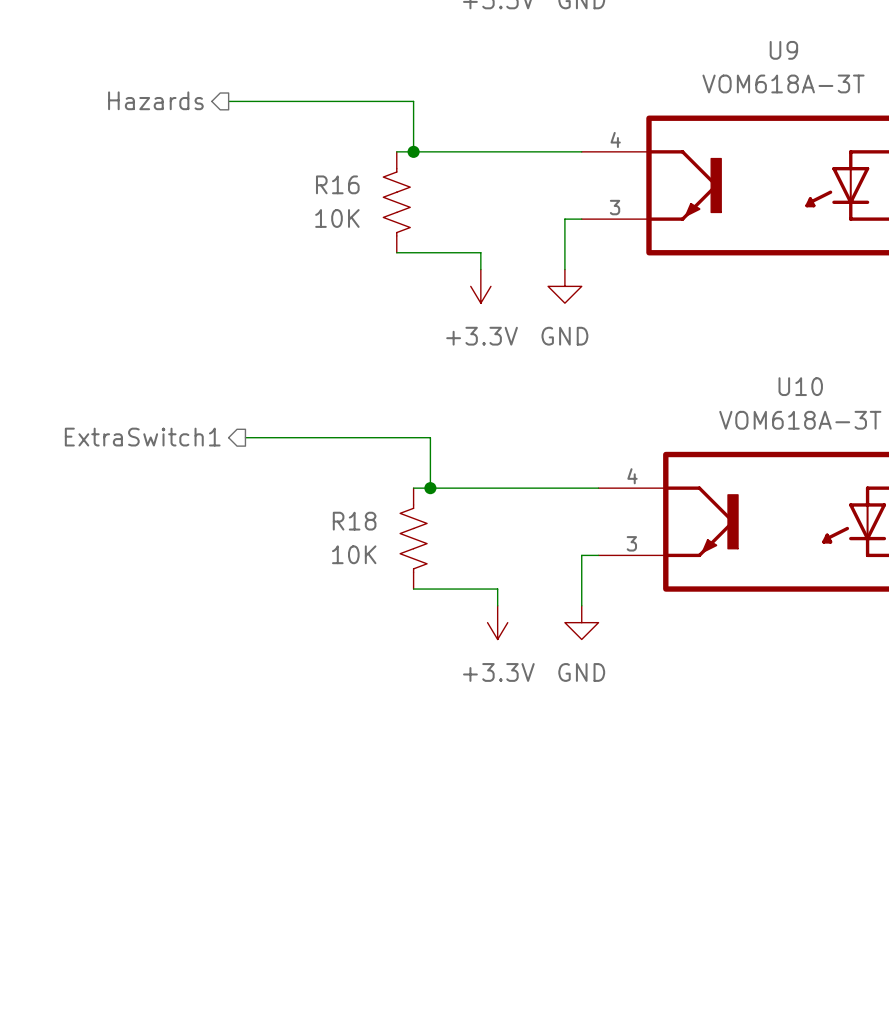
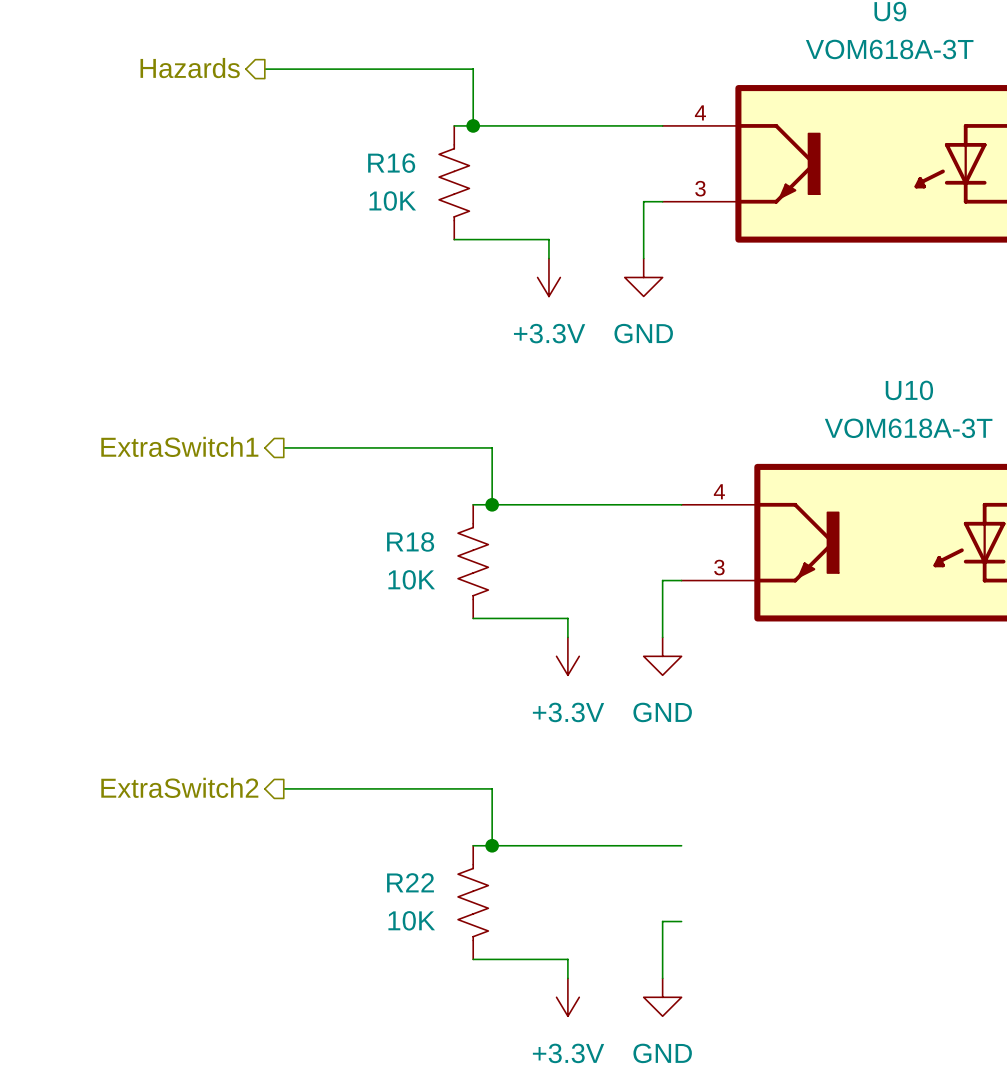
hierarchical label: none -> ExtraSwitch2 (179, 787)
wire: none -> (283, 788) (492, 788) (492, 845)
wire: none -> (473, 845) (681, 845)
junction: none -> (492, 845)
R22: none -> 10K (473, 902)
wire: none -> (681, 921) (662, 921) (662, 978)
wire: none -> (473, 959) (567, 959) (567, 978)
power symbol: none -> +3.3V (567, 997)
power symbol: none -> GND (662, 997)

